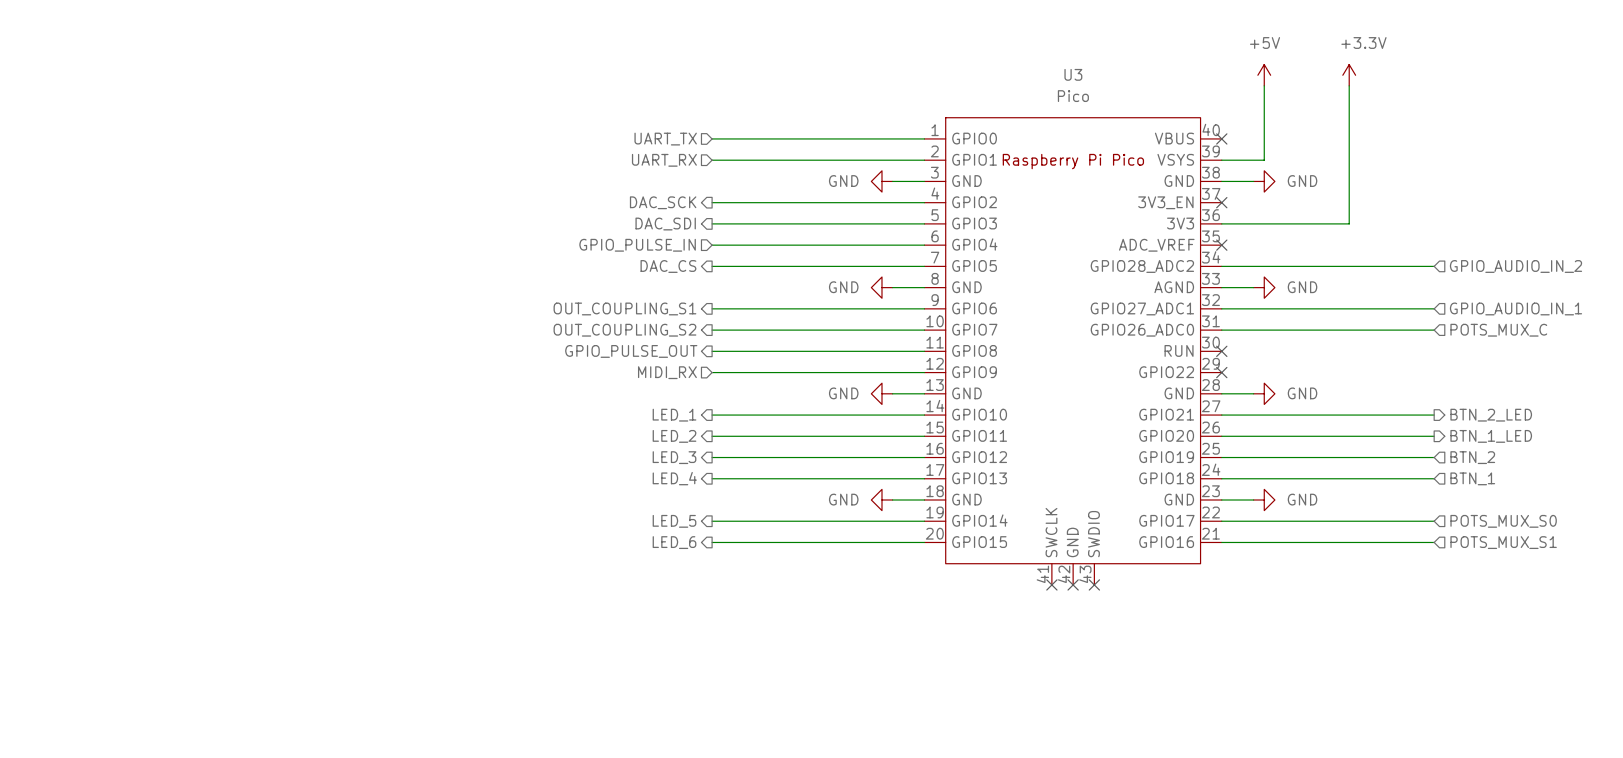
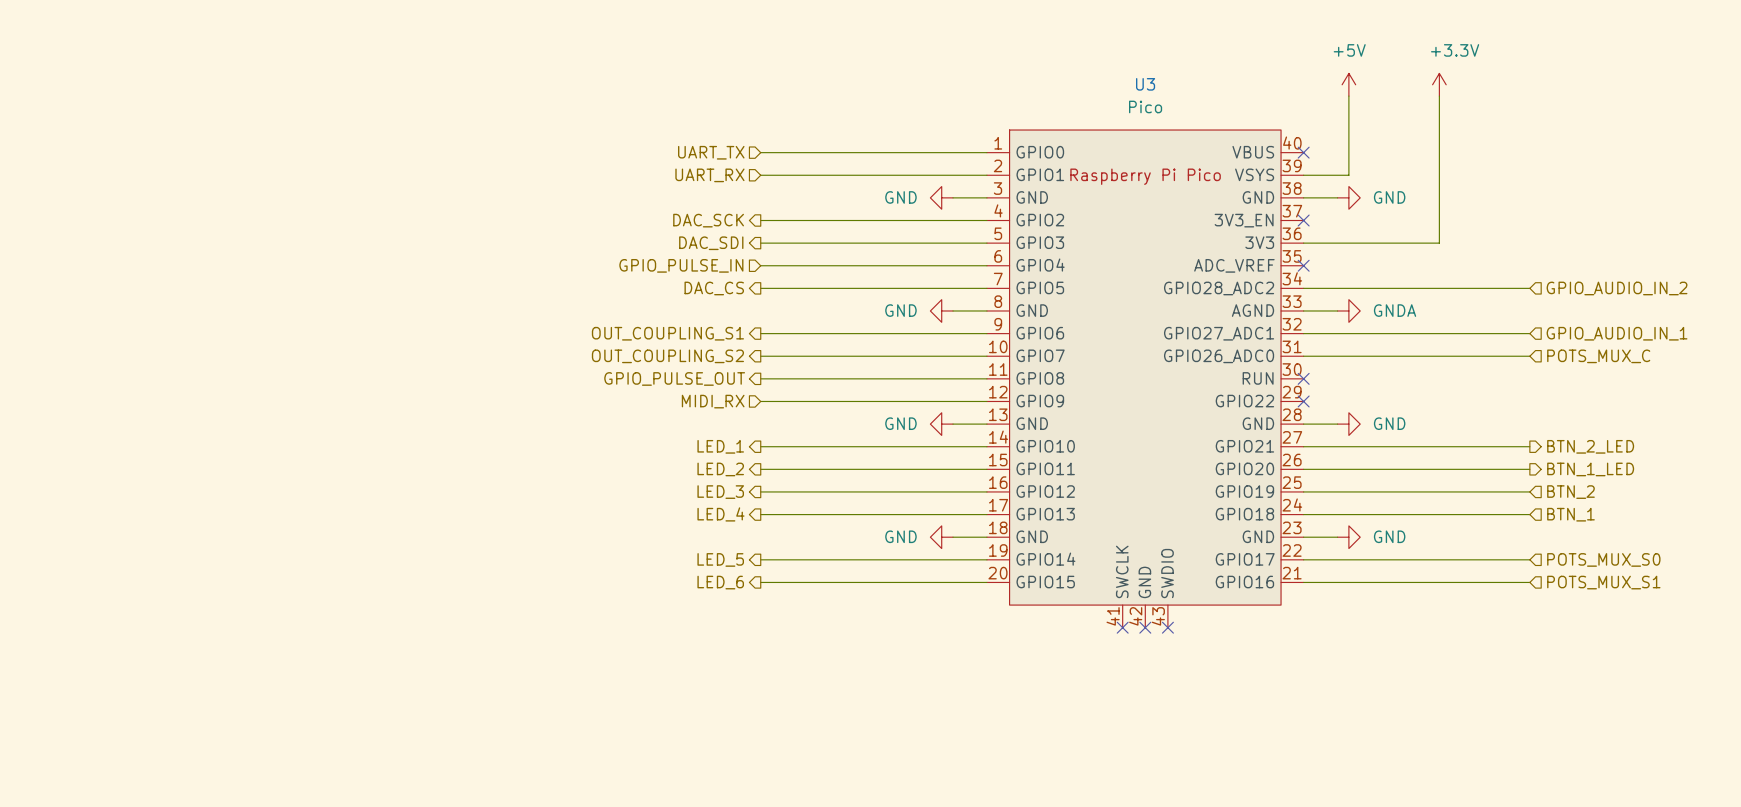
power symbol: GND (1264, 287) -> GNDA (1348, 310)

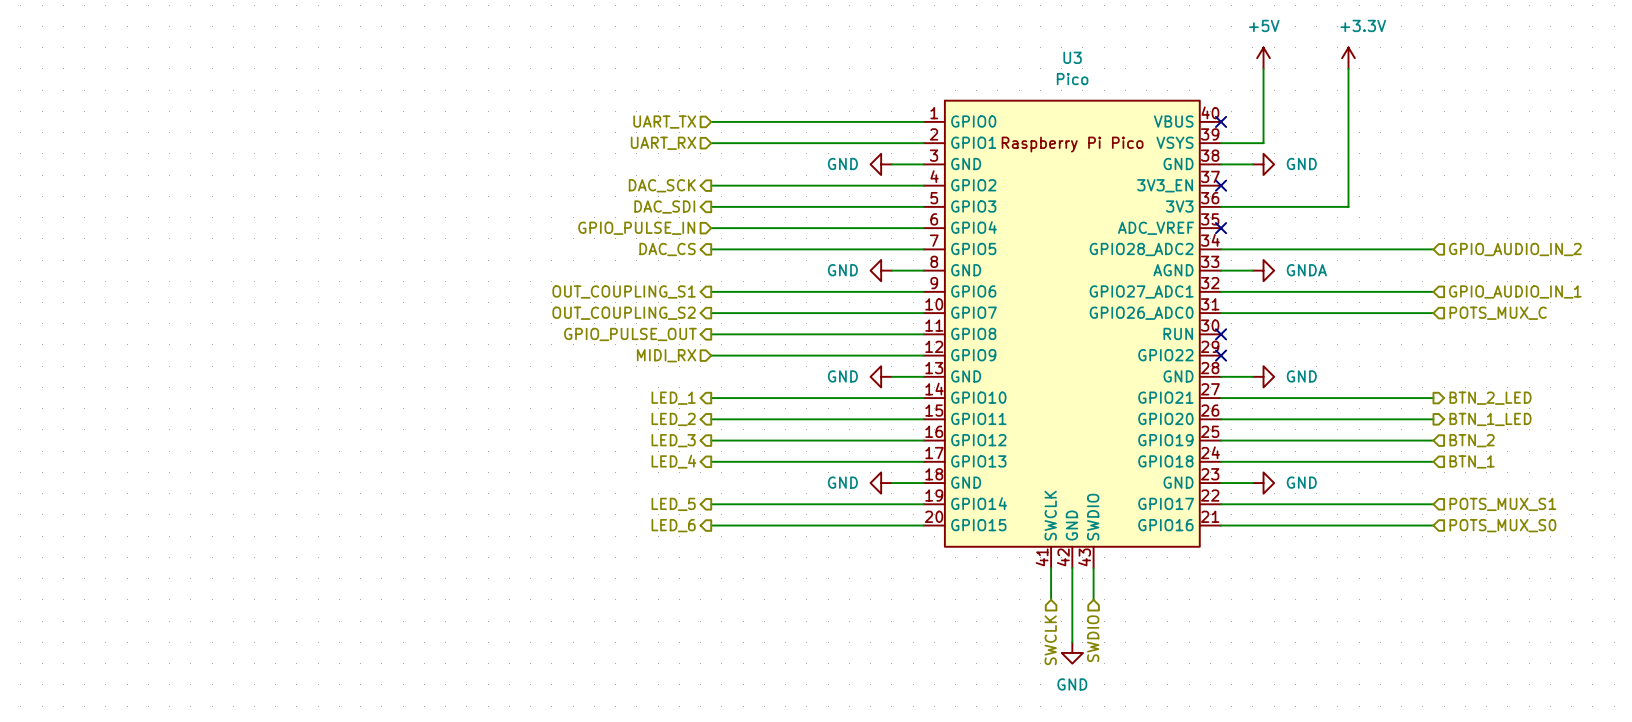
hierarchical label: POTS_MUX_S0 (1603, 559) -> POTS_MUX_S1 (1502, 504)
hierarchical label: POTS_MUX_S1 (1603, 582) -> POTS_MUX_S0 (1502, 525)
wire: none -> (1051, 568) (1051, 599)
no-connect mark: (1122, 627) -> none
wire: none -> (1072, 568) (1072, 642)
no-connect mark: (1145, 627) -> none
wire: none -> (1093, 568) (1093, 599)
no-connect mark: (1167, 627) -> none
hierarchical label: none -> SWDIO (1093, 638)
hierarchical label: none -> SWCLK (1050, 640)
power symbol: none -> GND (1072, 652)

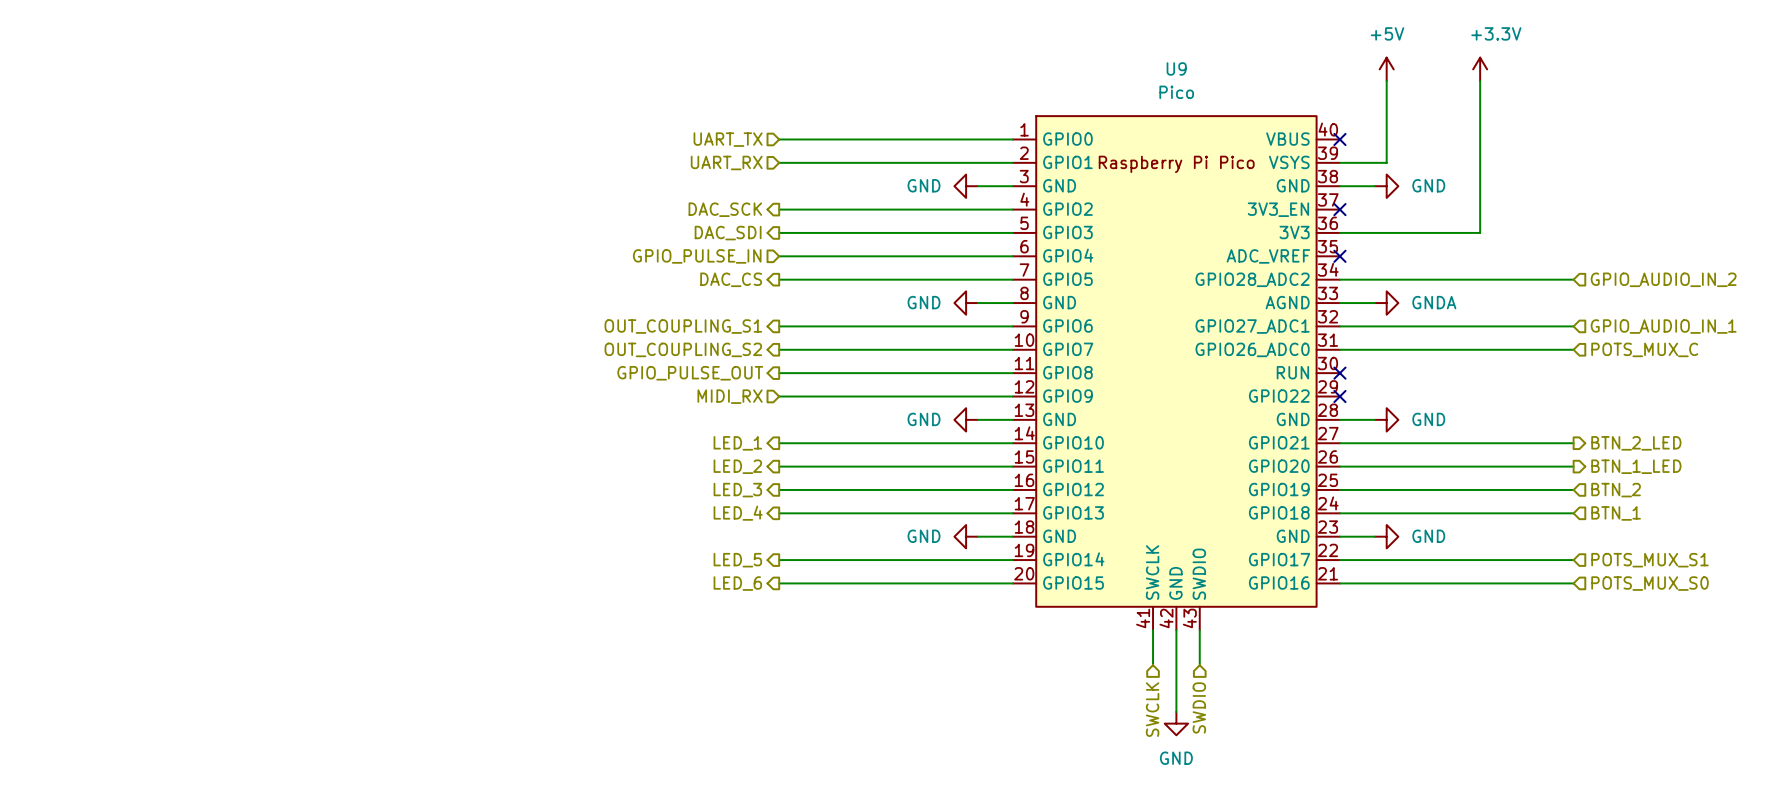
U3 name: U3 (1072, 57) -> U9 (1176, 68)

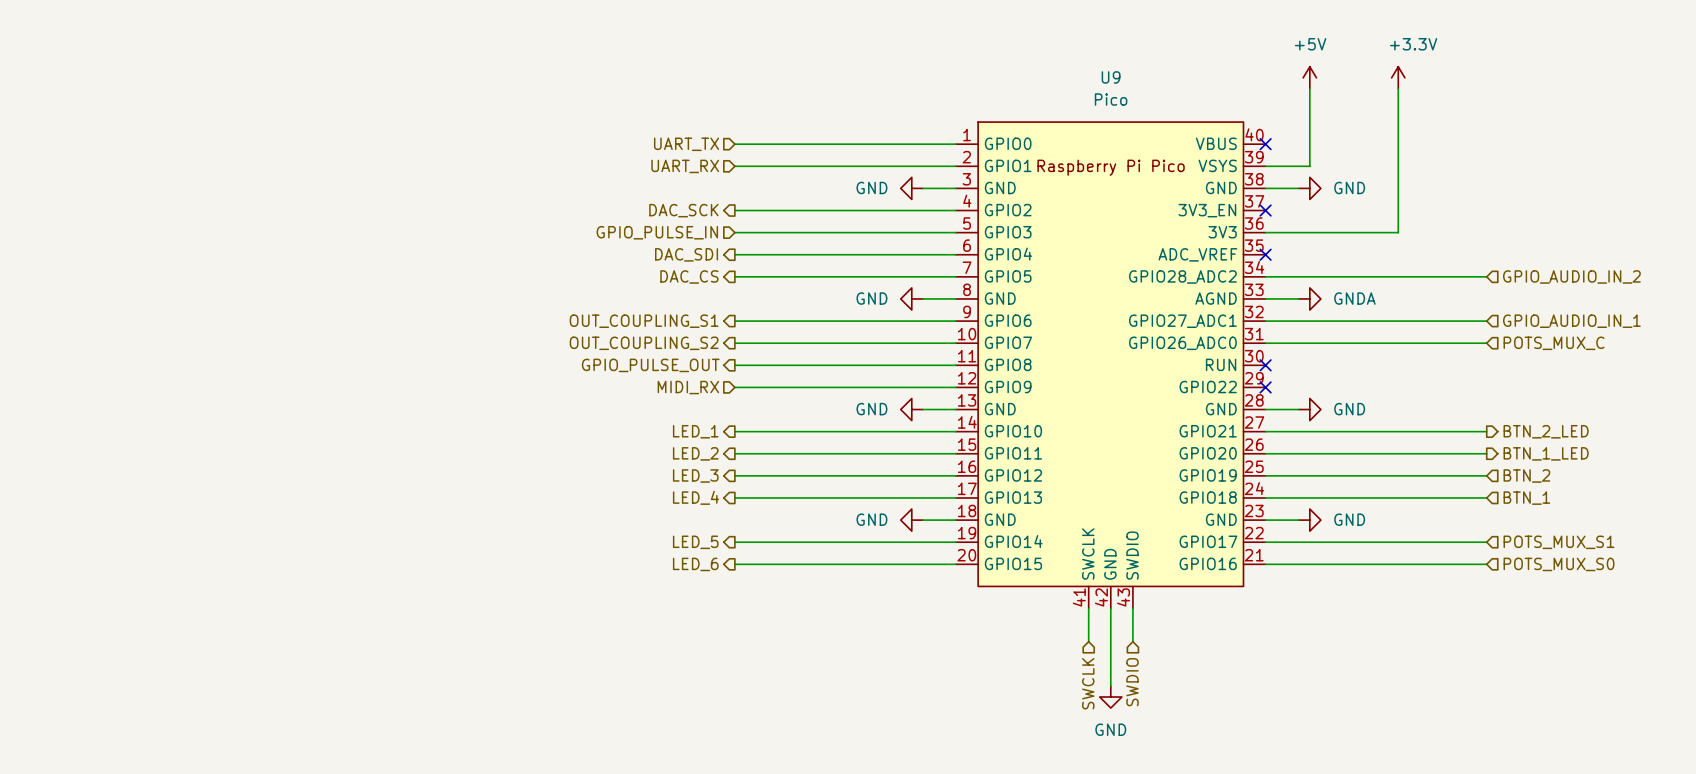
hierarchical label shape: output (728, 233) -> input (657, 232)
hierarchical label: DAC_SDI (728, 233) -> GPIO_PULSE_IN (657, 232)
hierarchical label shape: input (697, 256) -> output (686, 254)
hierarchical label: GPIO_PULSE_IN (697, 256) -> DAC_SDI (686, 254)

